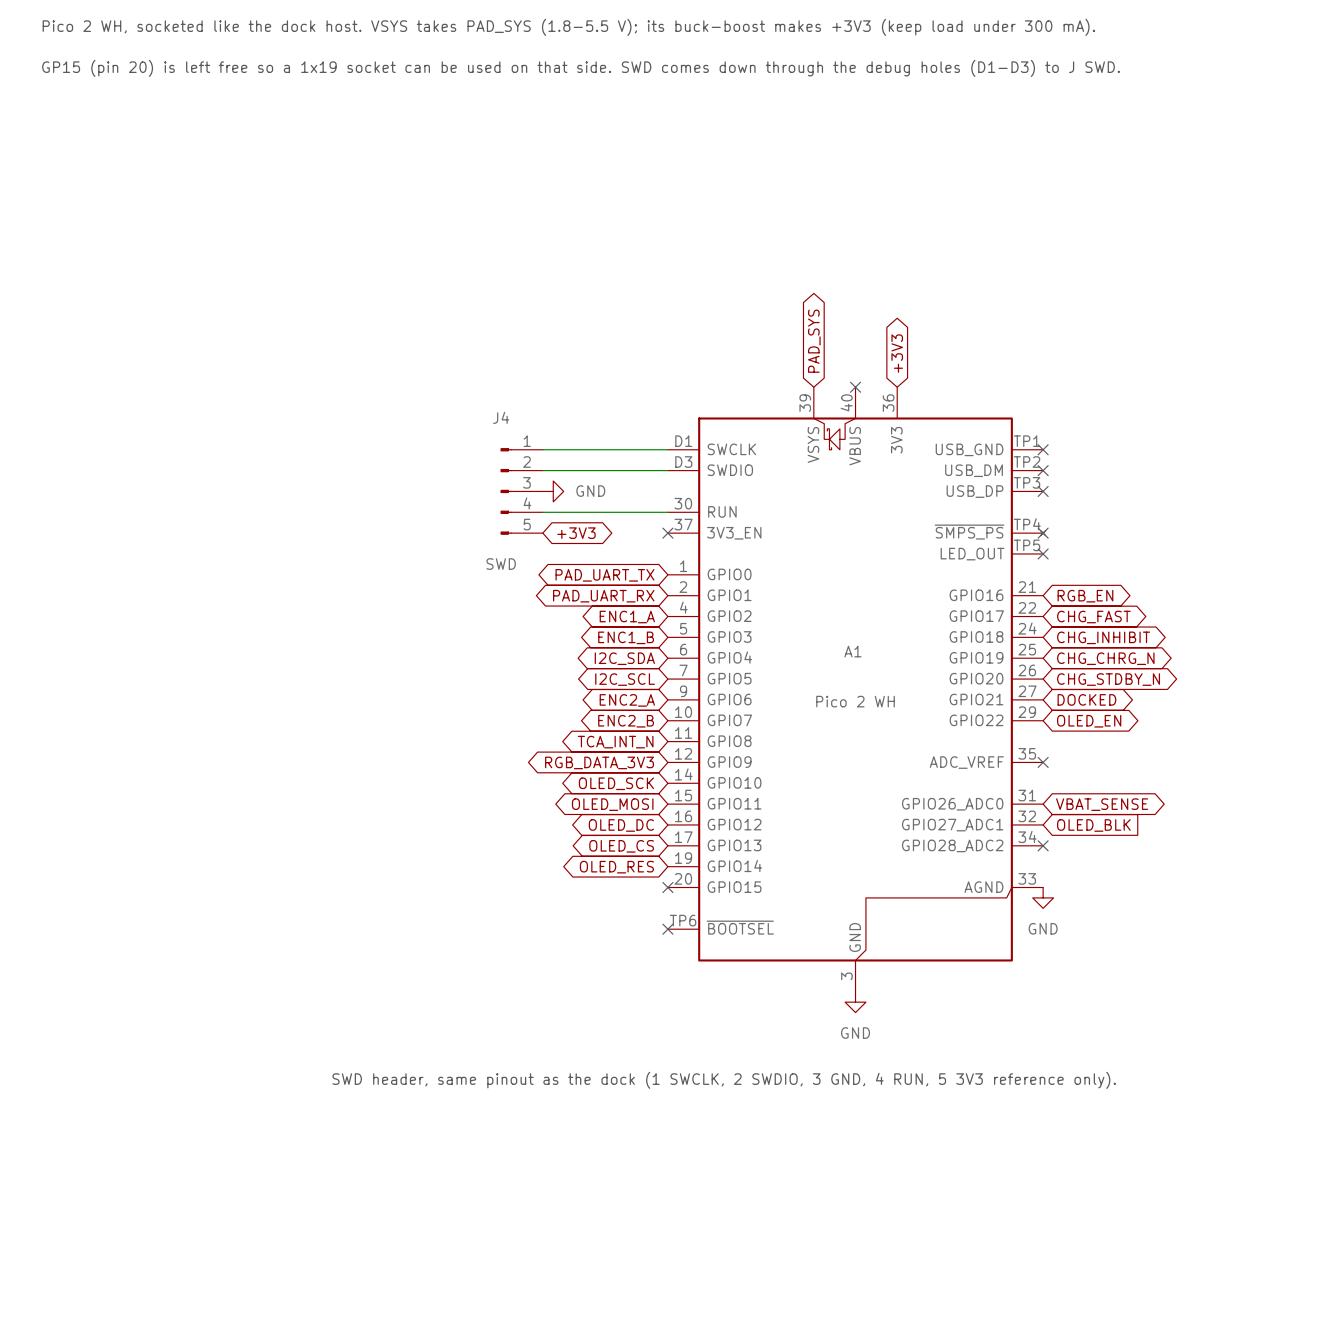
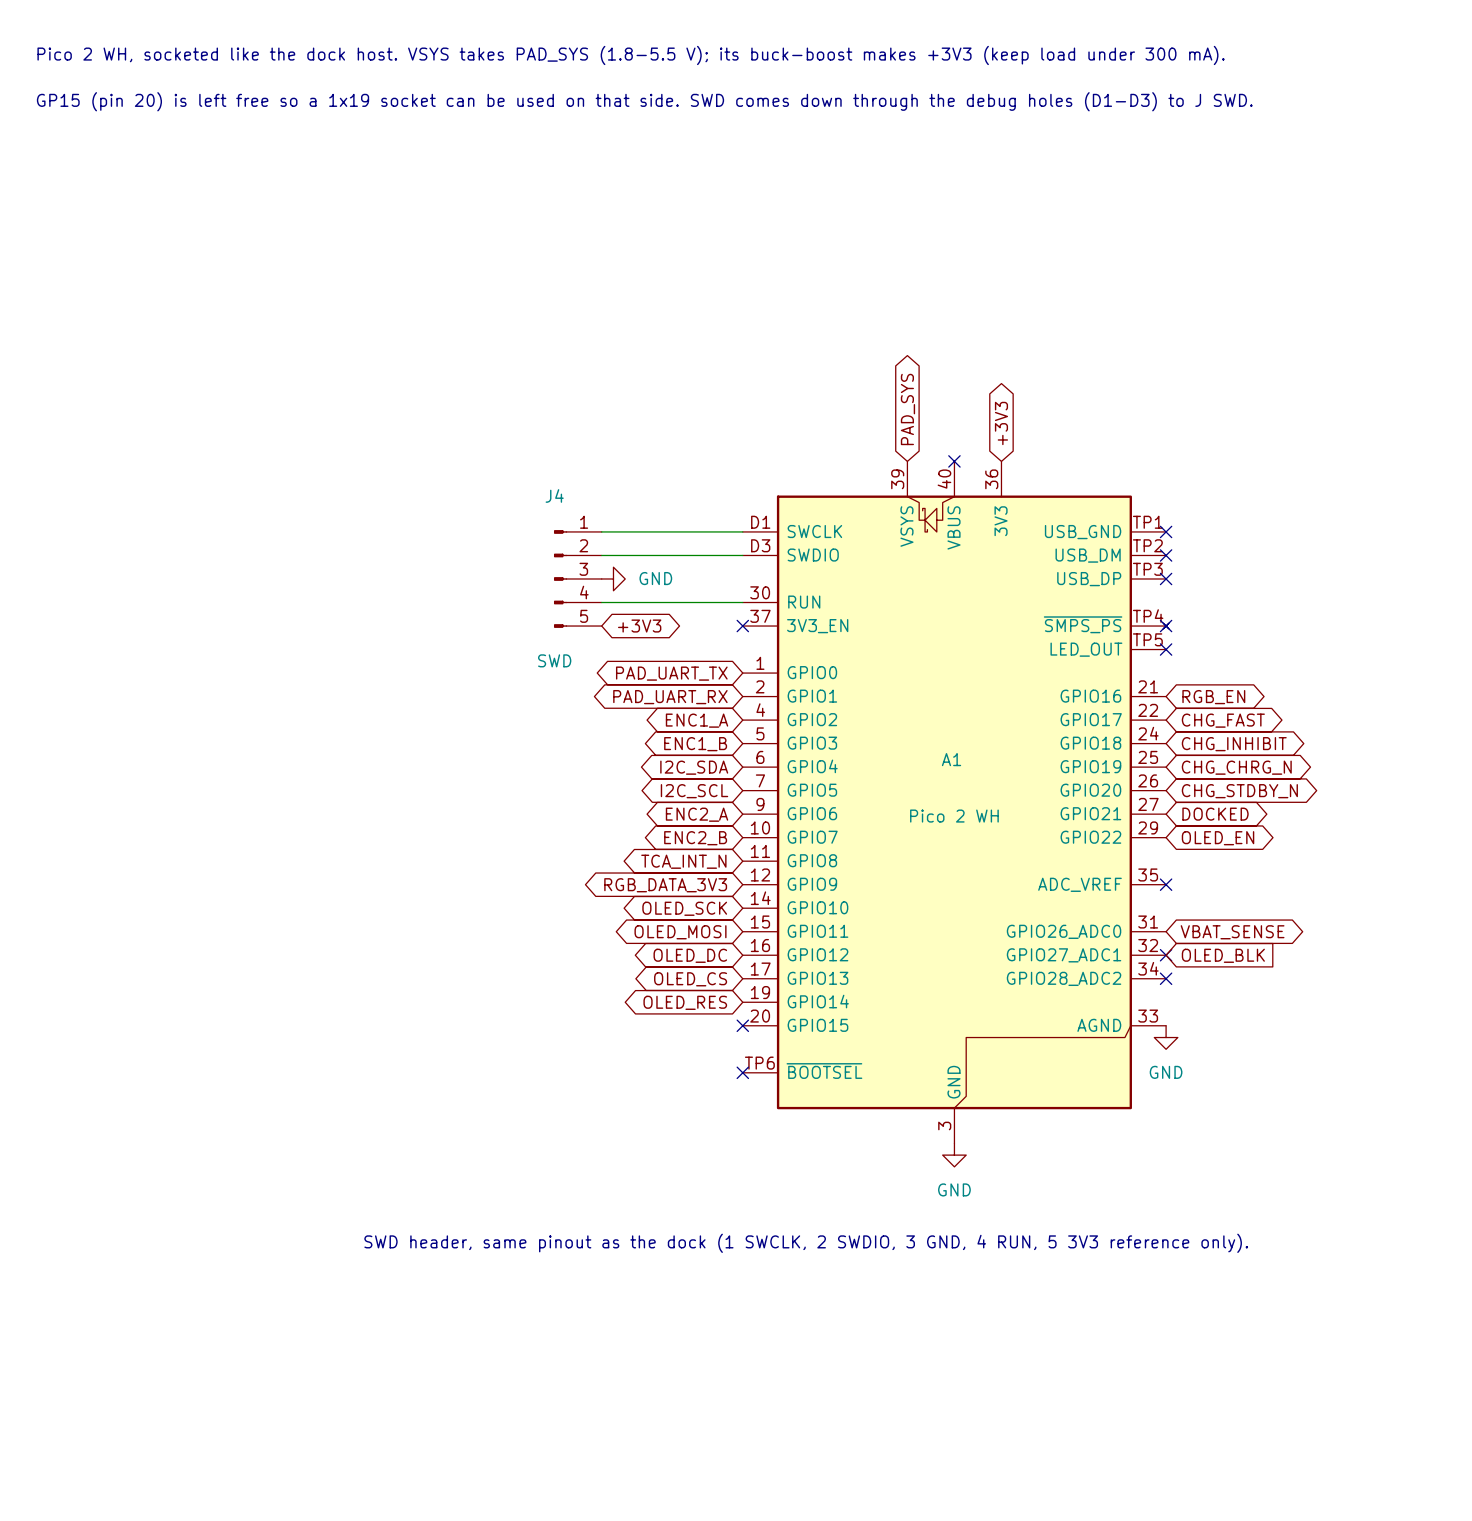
no-connect mark: none -> (1166, 955)

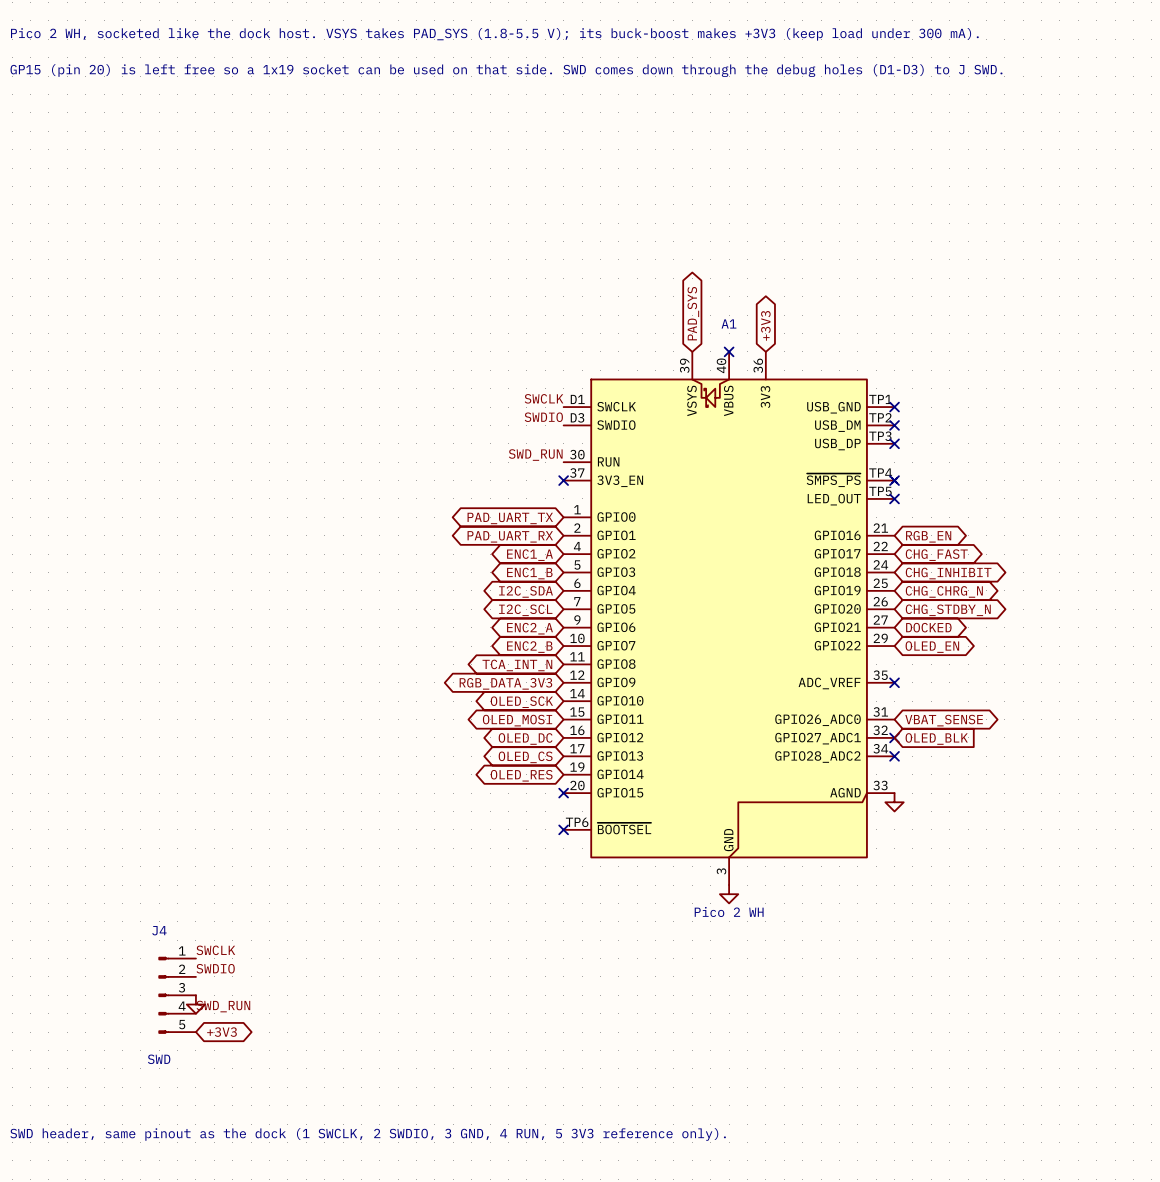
label: none -> SWCLK (544, 398)
wire: (601, 531) (742, 531) -> none
label: none -> SWDIO (543, 417)
wire: (601, 555) (742, 555) -> none
J4 position: (577, 578) -> (177, 995)
power symbol: GND (613, 578) -> none
label: none -> SWD_RUN (535, 455)
wire: (601, 602) (742, 602) -> none
global label: +3V3 (639, 626) -> none
A1 name position: A1 (951, 759) -> A1 (728, 323)
A1 value position: Pico 2 WH (954, 816) -> Pico 2 WH (729, 912)
power symbol text: GND (1166, 1072) -> none
power symbol text: GND (954, 1189) -> none
label: none -> SWCLK (215, 950)
text: SWD header, same pinout as the dock (1 SWCLK, 2 SWDIO, 3 GND, 4 RUN, 5 3V3 reference only). (806, 1243) -> none
label: none -> SWDIO (215, 968)
power symbol: none -> (195, 1004)
label: none -> SWD_RUN (223, 1006)
global label: none -> +3V3 (221, 1032)
text: none -> SWD header, same pinout as the dock (1 SWCLK, 2 SWDIO, 3 GND, 4 RUN, 5 3V3 reference only). (368, 1134)

